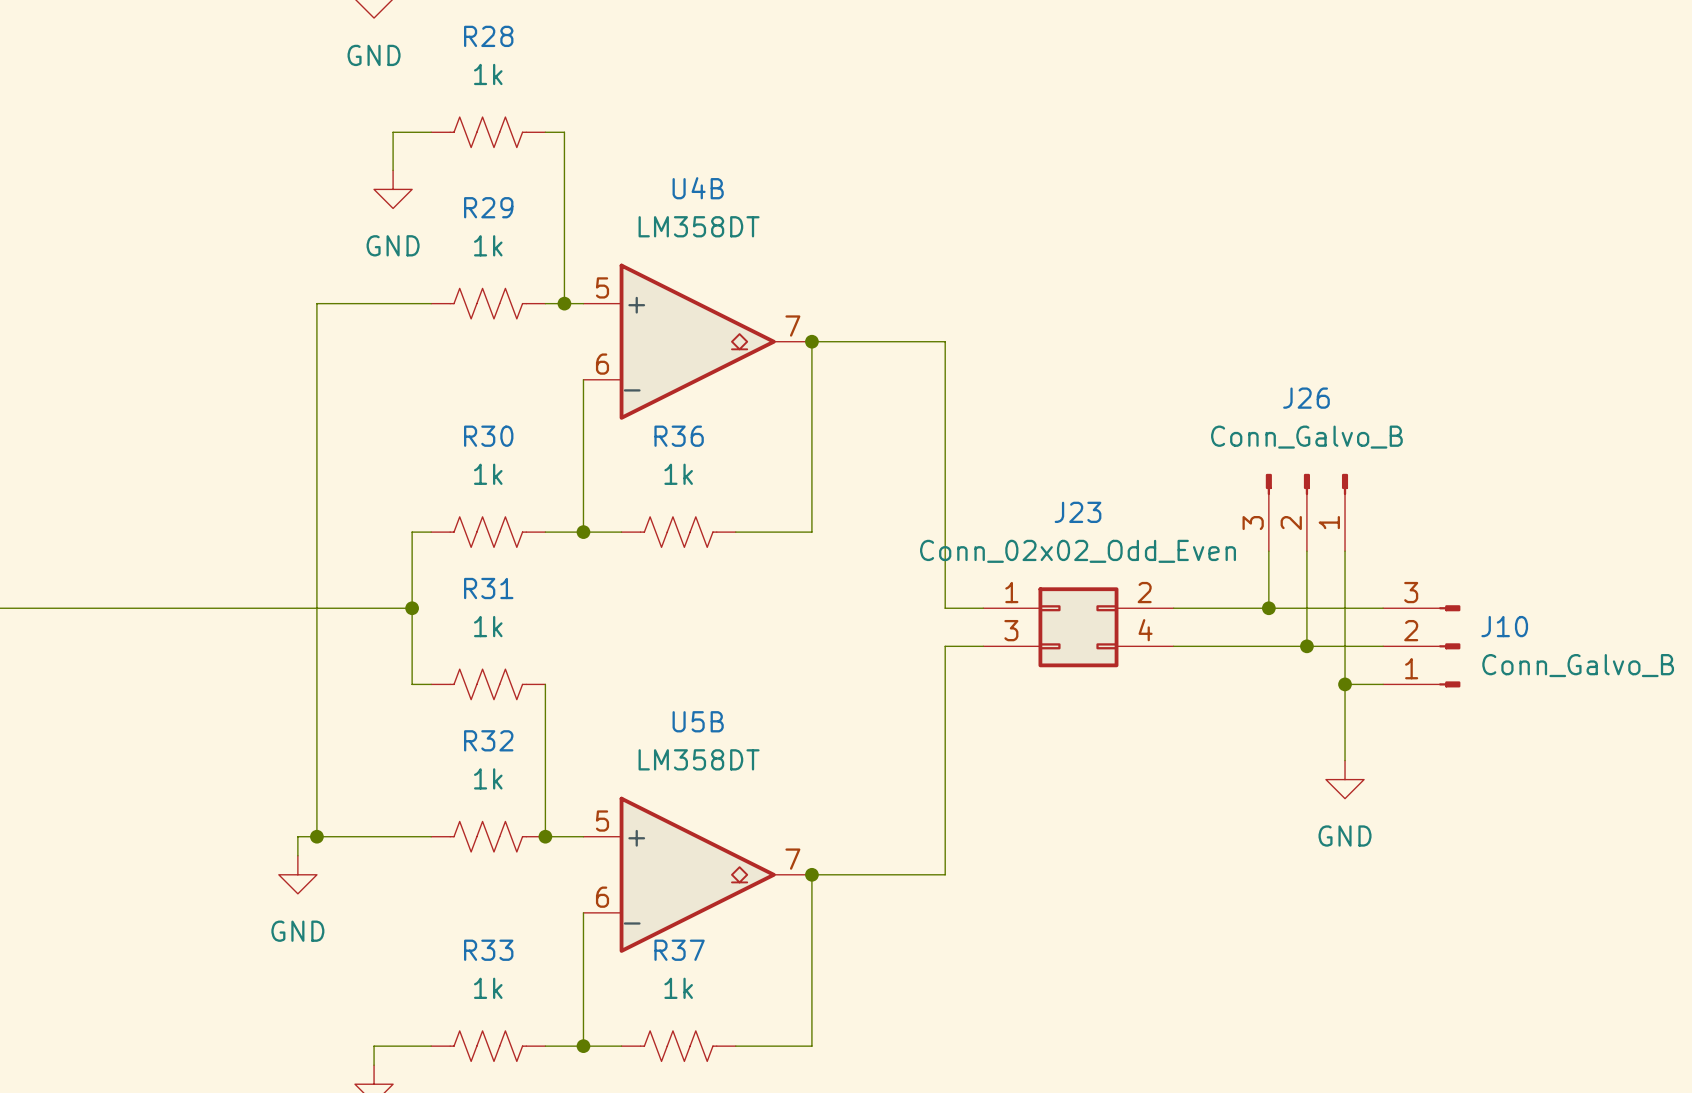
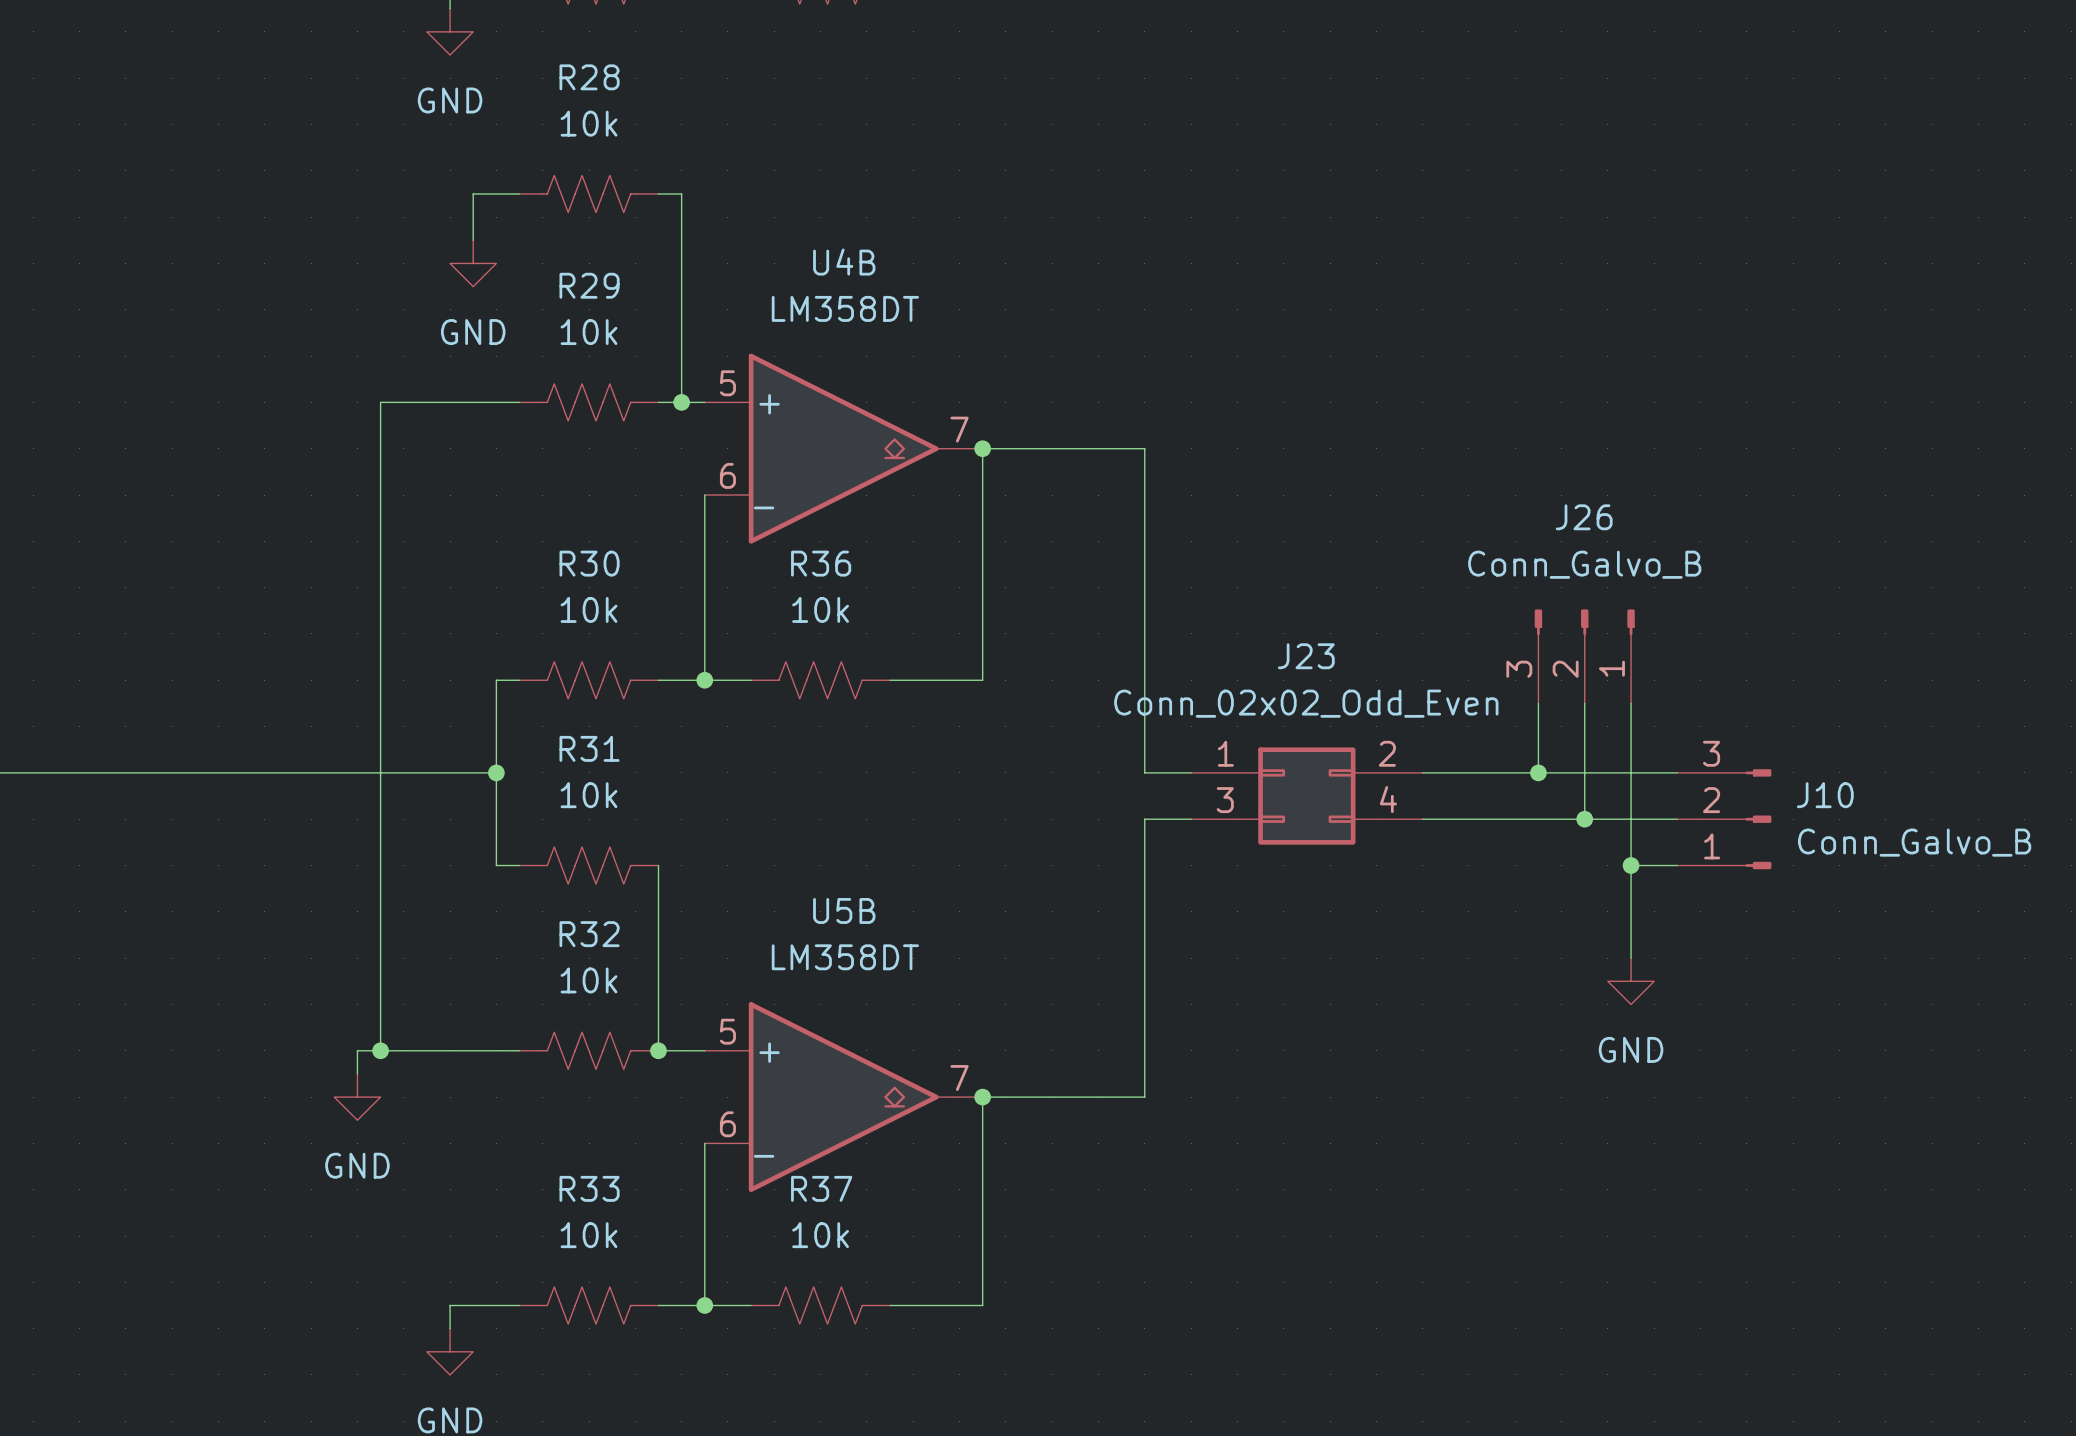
R28 value: 1k (488, 74) -> 10k (589, 123)
R29 value: 1k (488, 245) -> 10k (589, 332)
R30 value: 1k (488, 474) -> 10k (589, 609)
R36 value: 1k (678, 474) -> 10k (820, 609)
R31 value: 1k (488, 626) -> 10k (589, 795)
R32 value: 1k (488, 778) -> 10k (589, 980)
R33 value: 1k (488, 988) -> 10k (589, 1235)
R37 value: 1k (678, 988) -> 10k (820, 1235)

